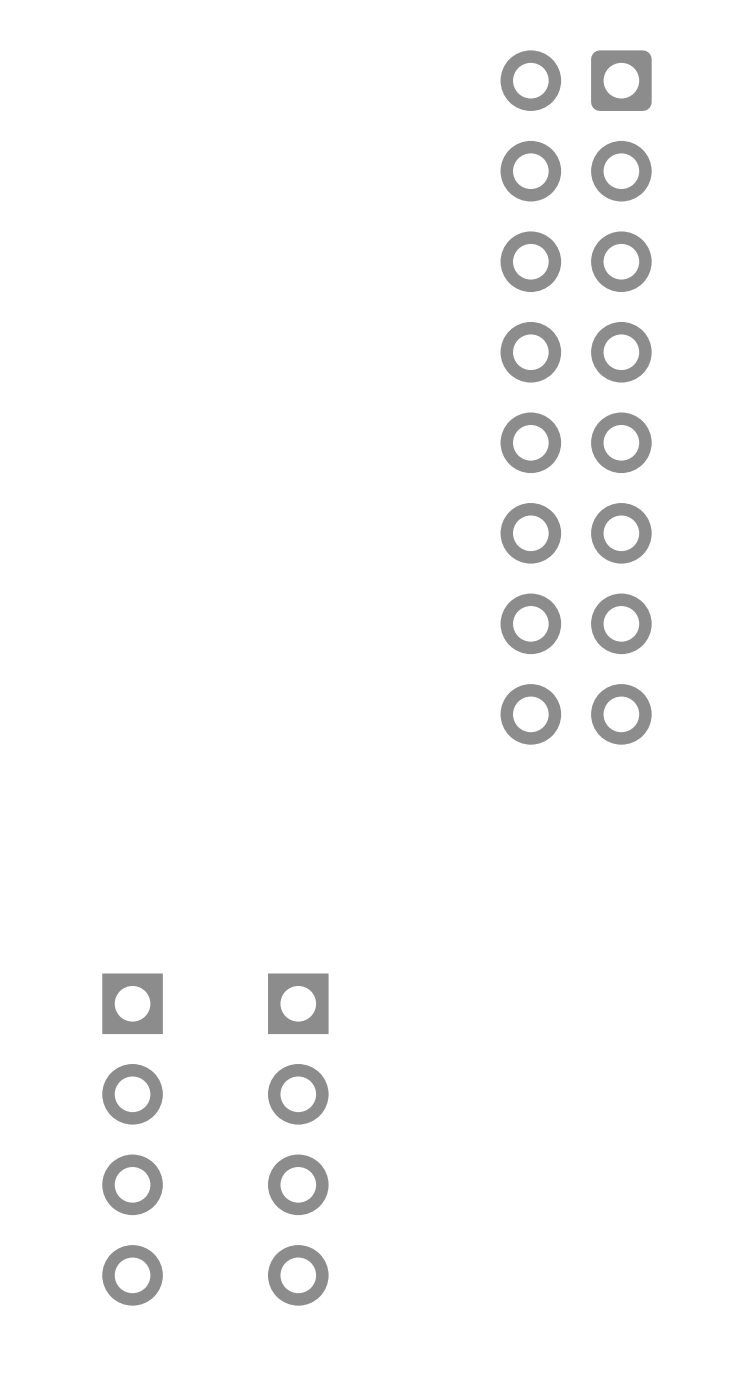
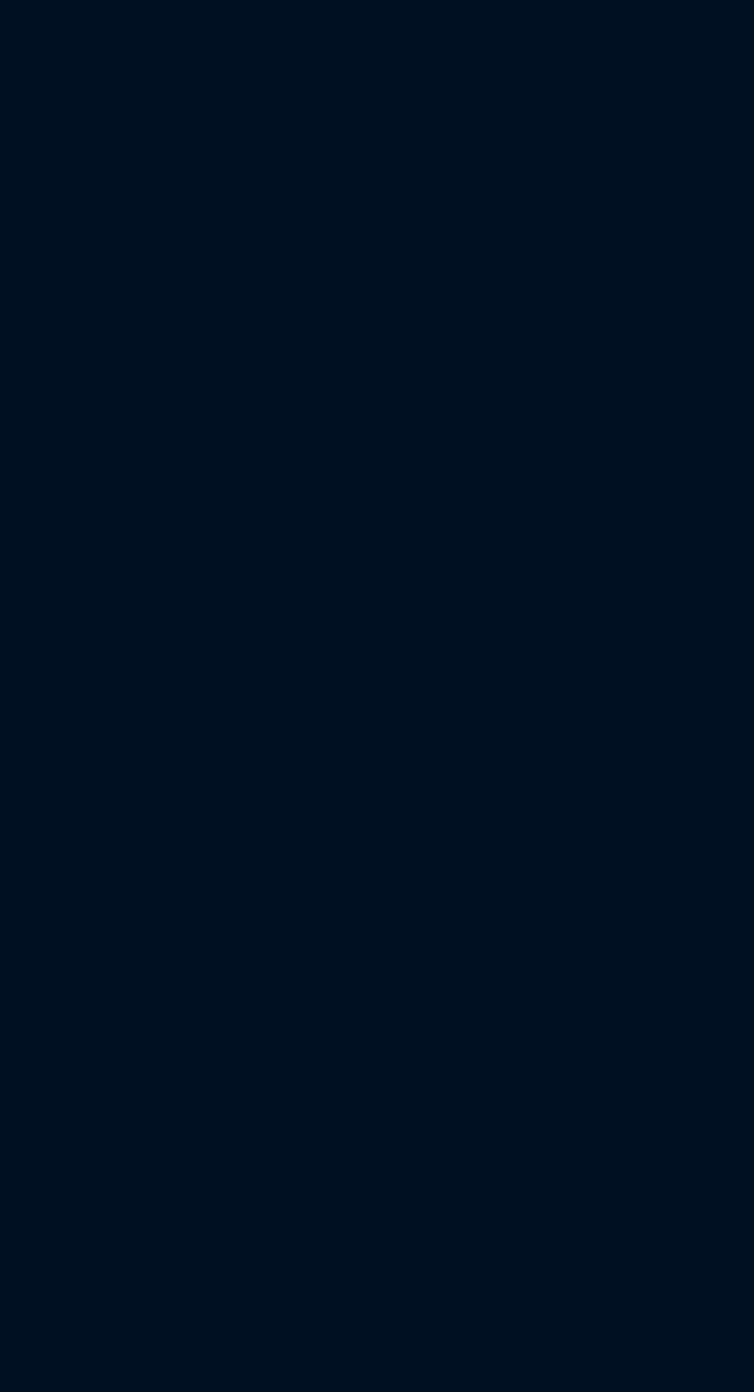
part: (576, 397) -> none
part: (132, 1139) -> none
part: (298, 1139) -> none

